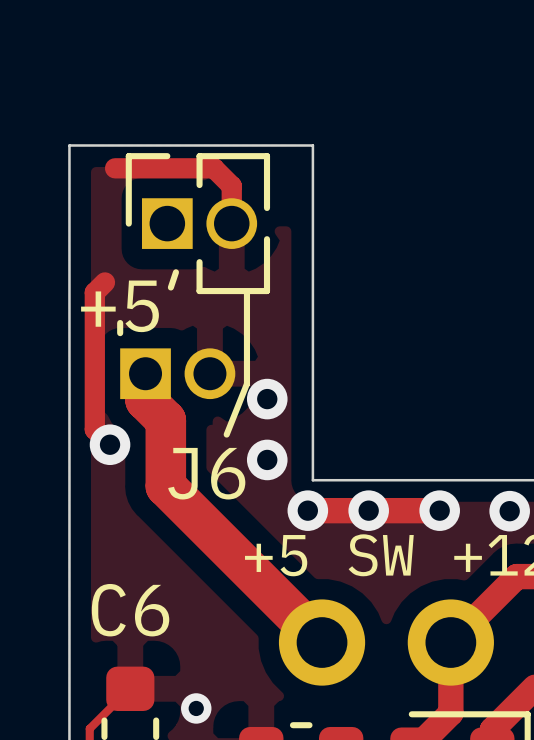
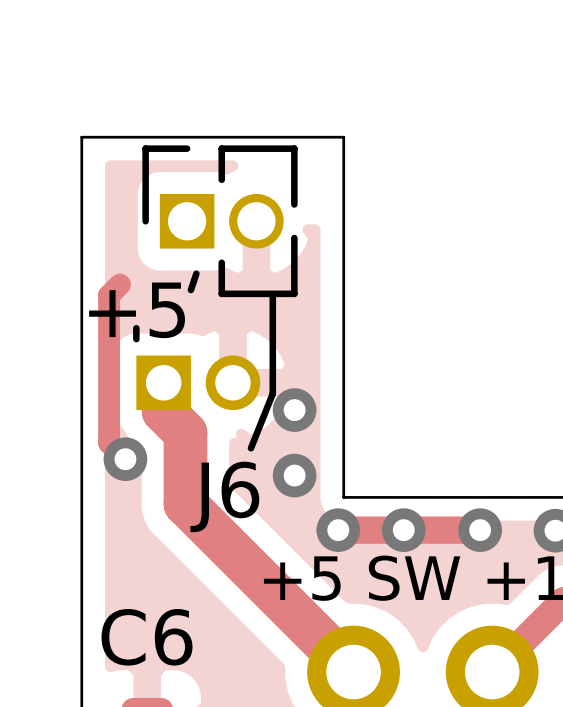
track: (115, 168) (214, 168) (231, 186) (231, 223) -> none

